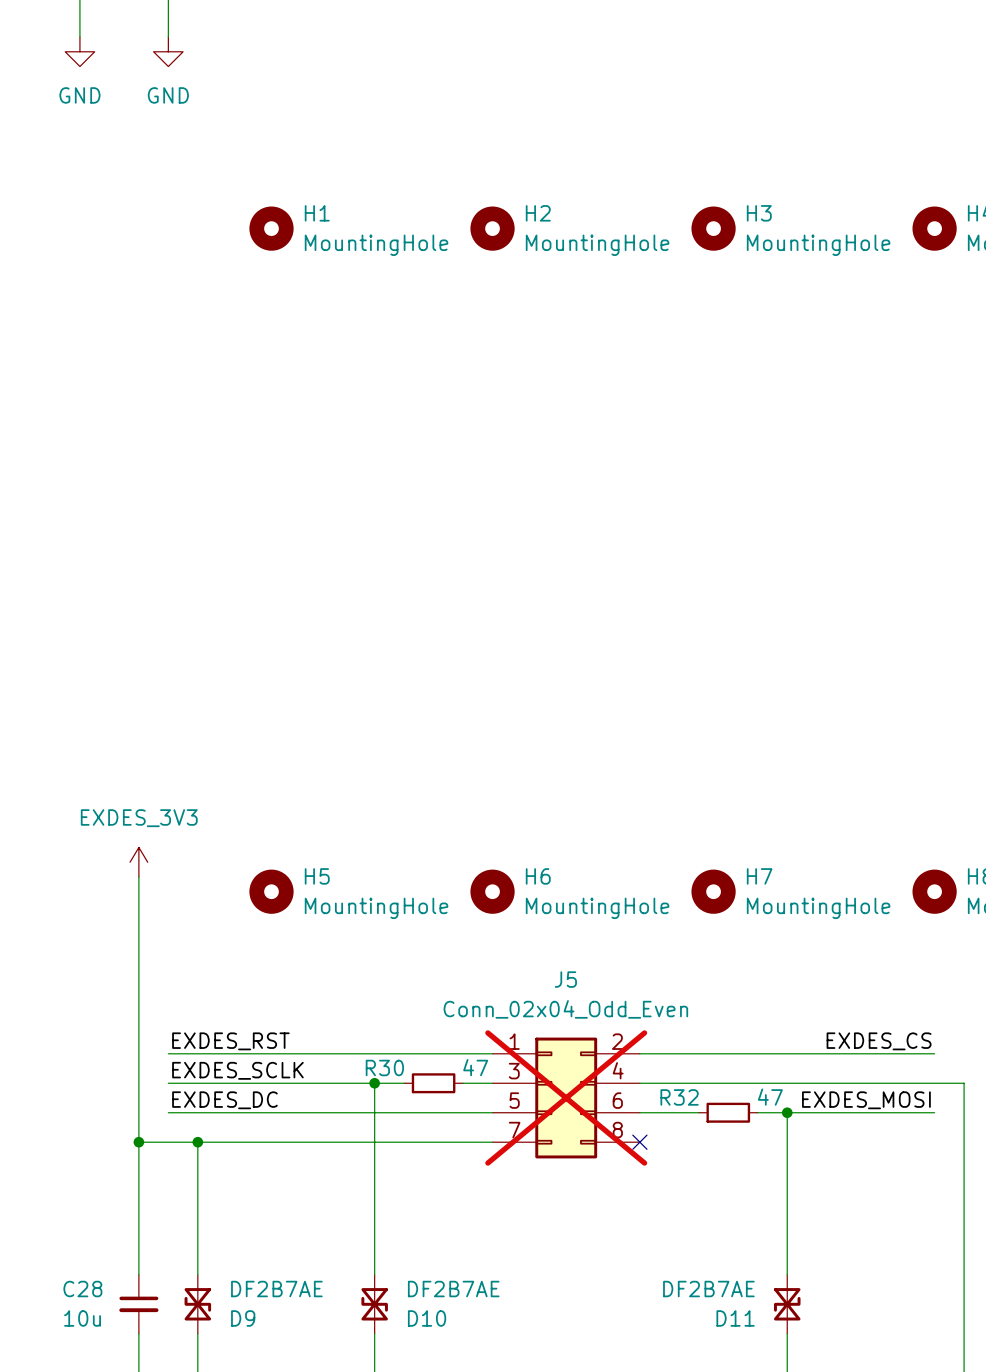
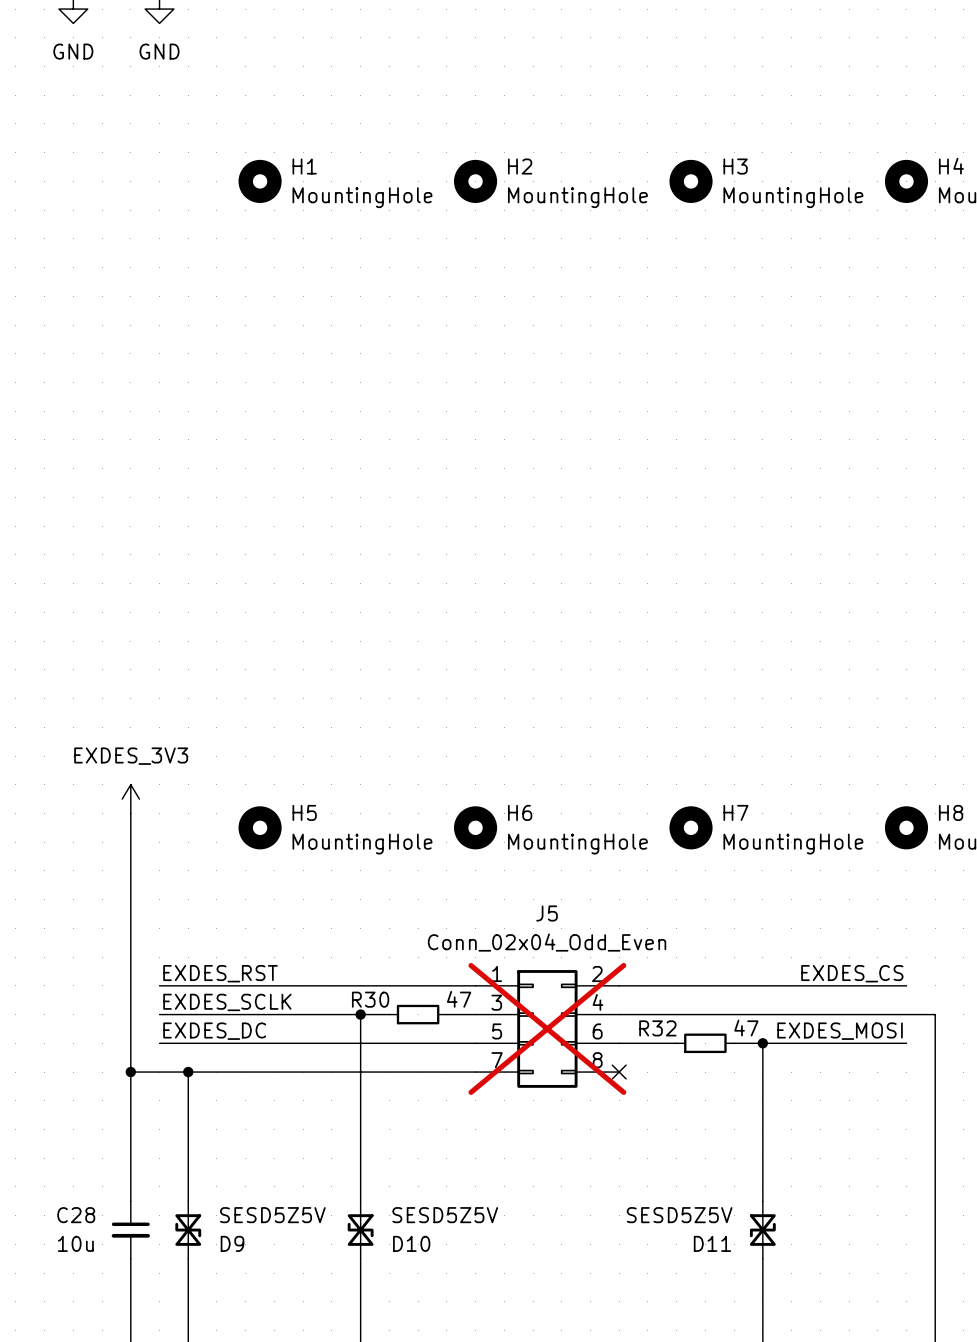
D9 value: DF2B7AE (276, 1289) -> SESD5Z5V (272, 1215)
D10 value: DF2B7AE (453, 1289) -> SESD5Z5V (445, 1215)
D11 value: DF2B7AE (708, 1289) -> SESD5Z5V (679, 1215)

